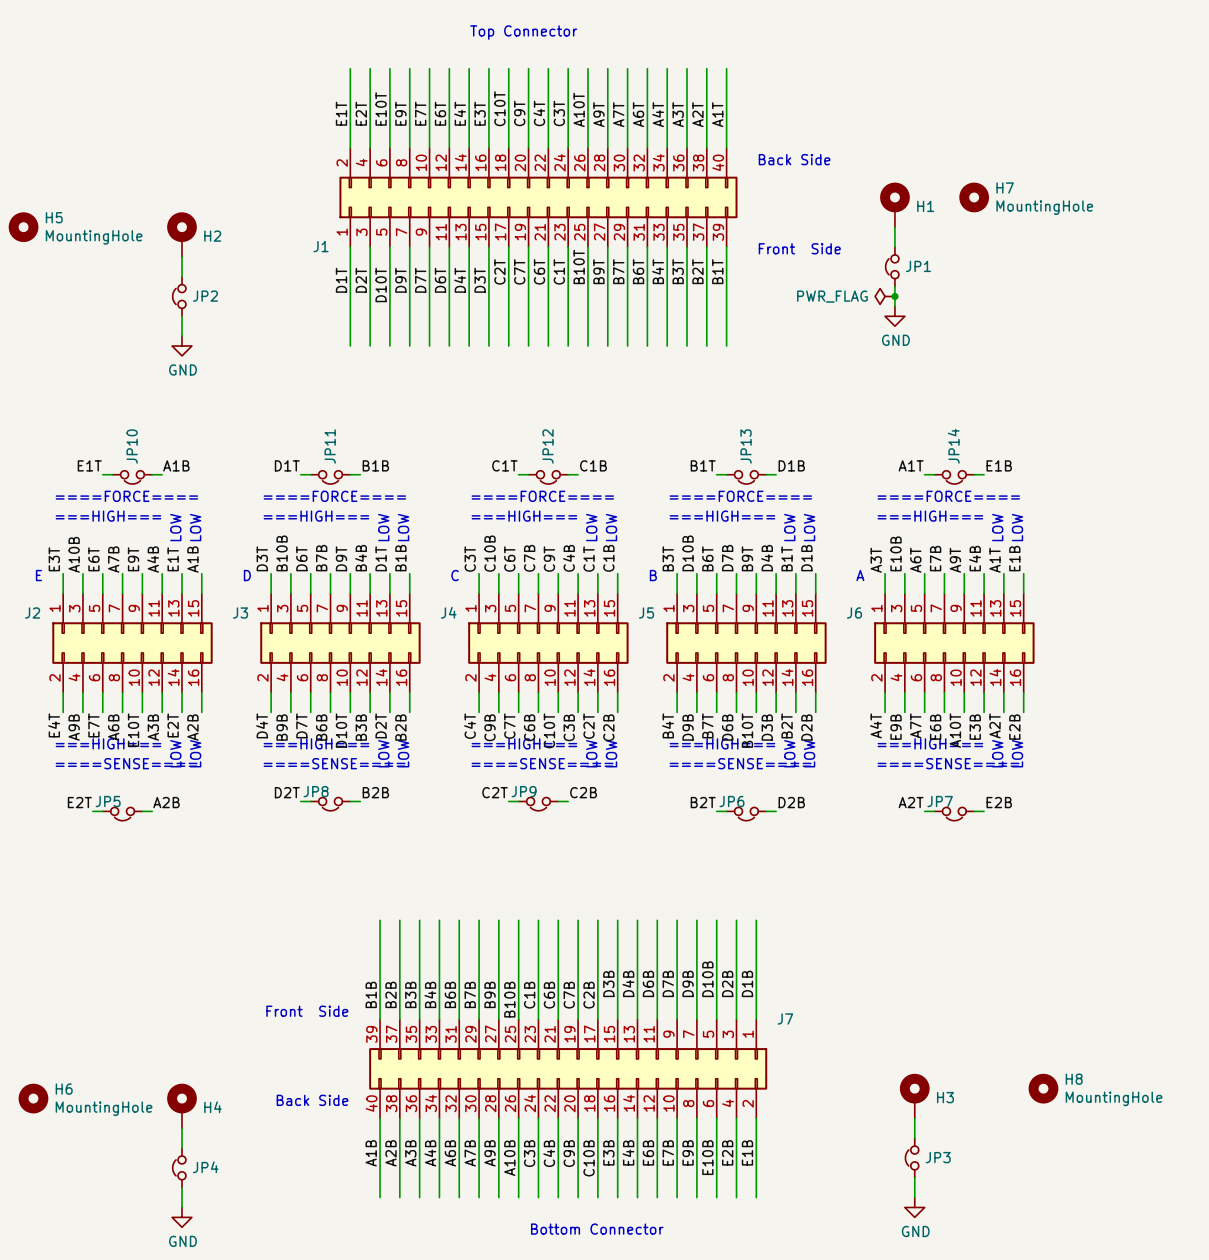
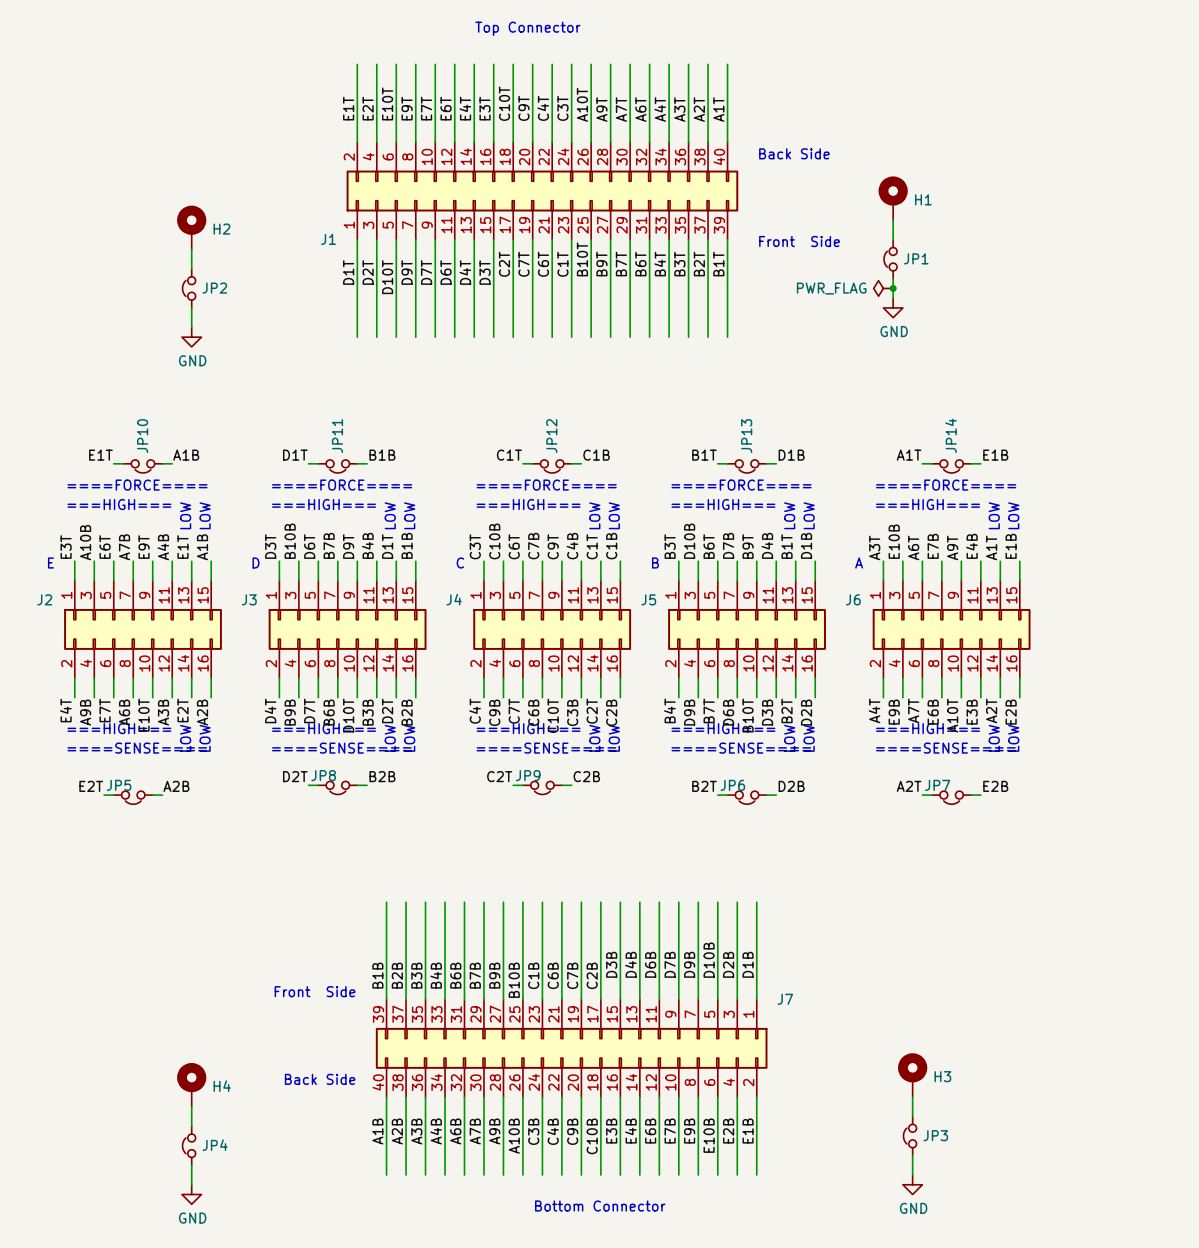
H7: MountingHole (974, 197) -> none
H5: MountingHole (23, 227) -> none
H8: MountingHole (1043, 1088) -> none
H6: MountingHole (33, 1098) -> none

